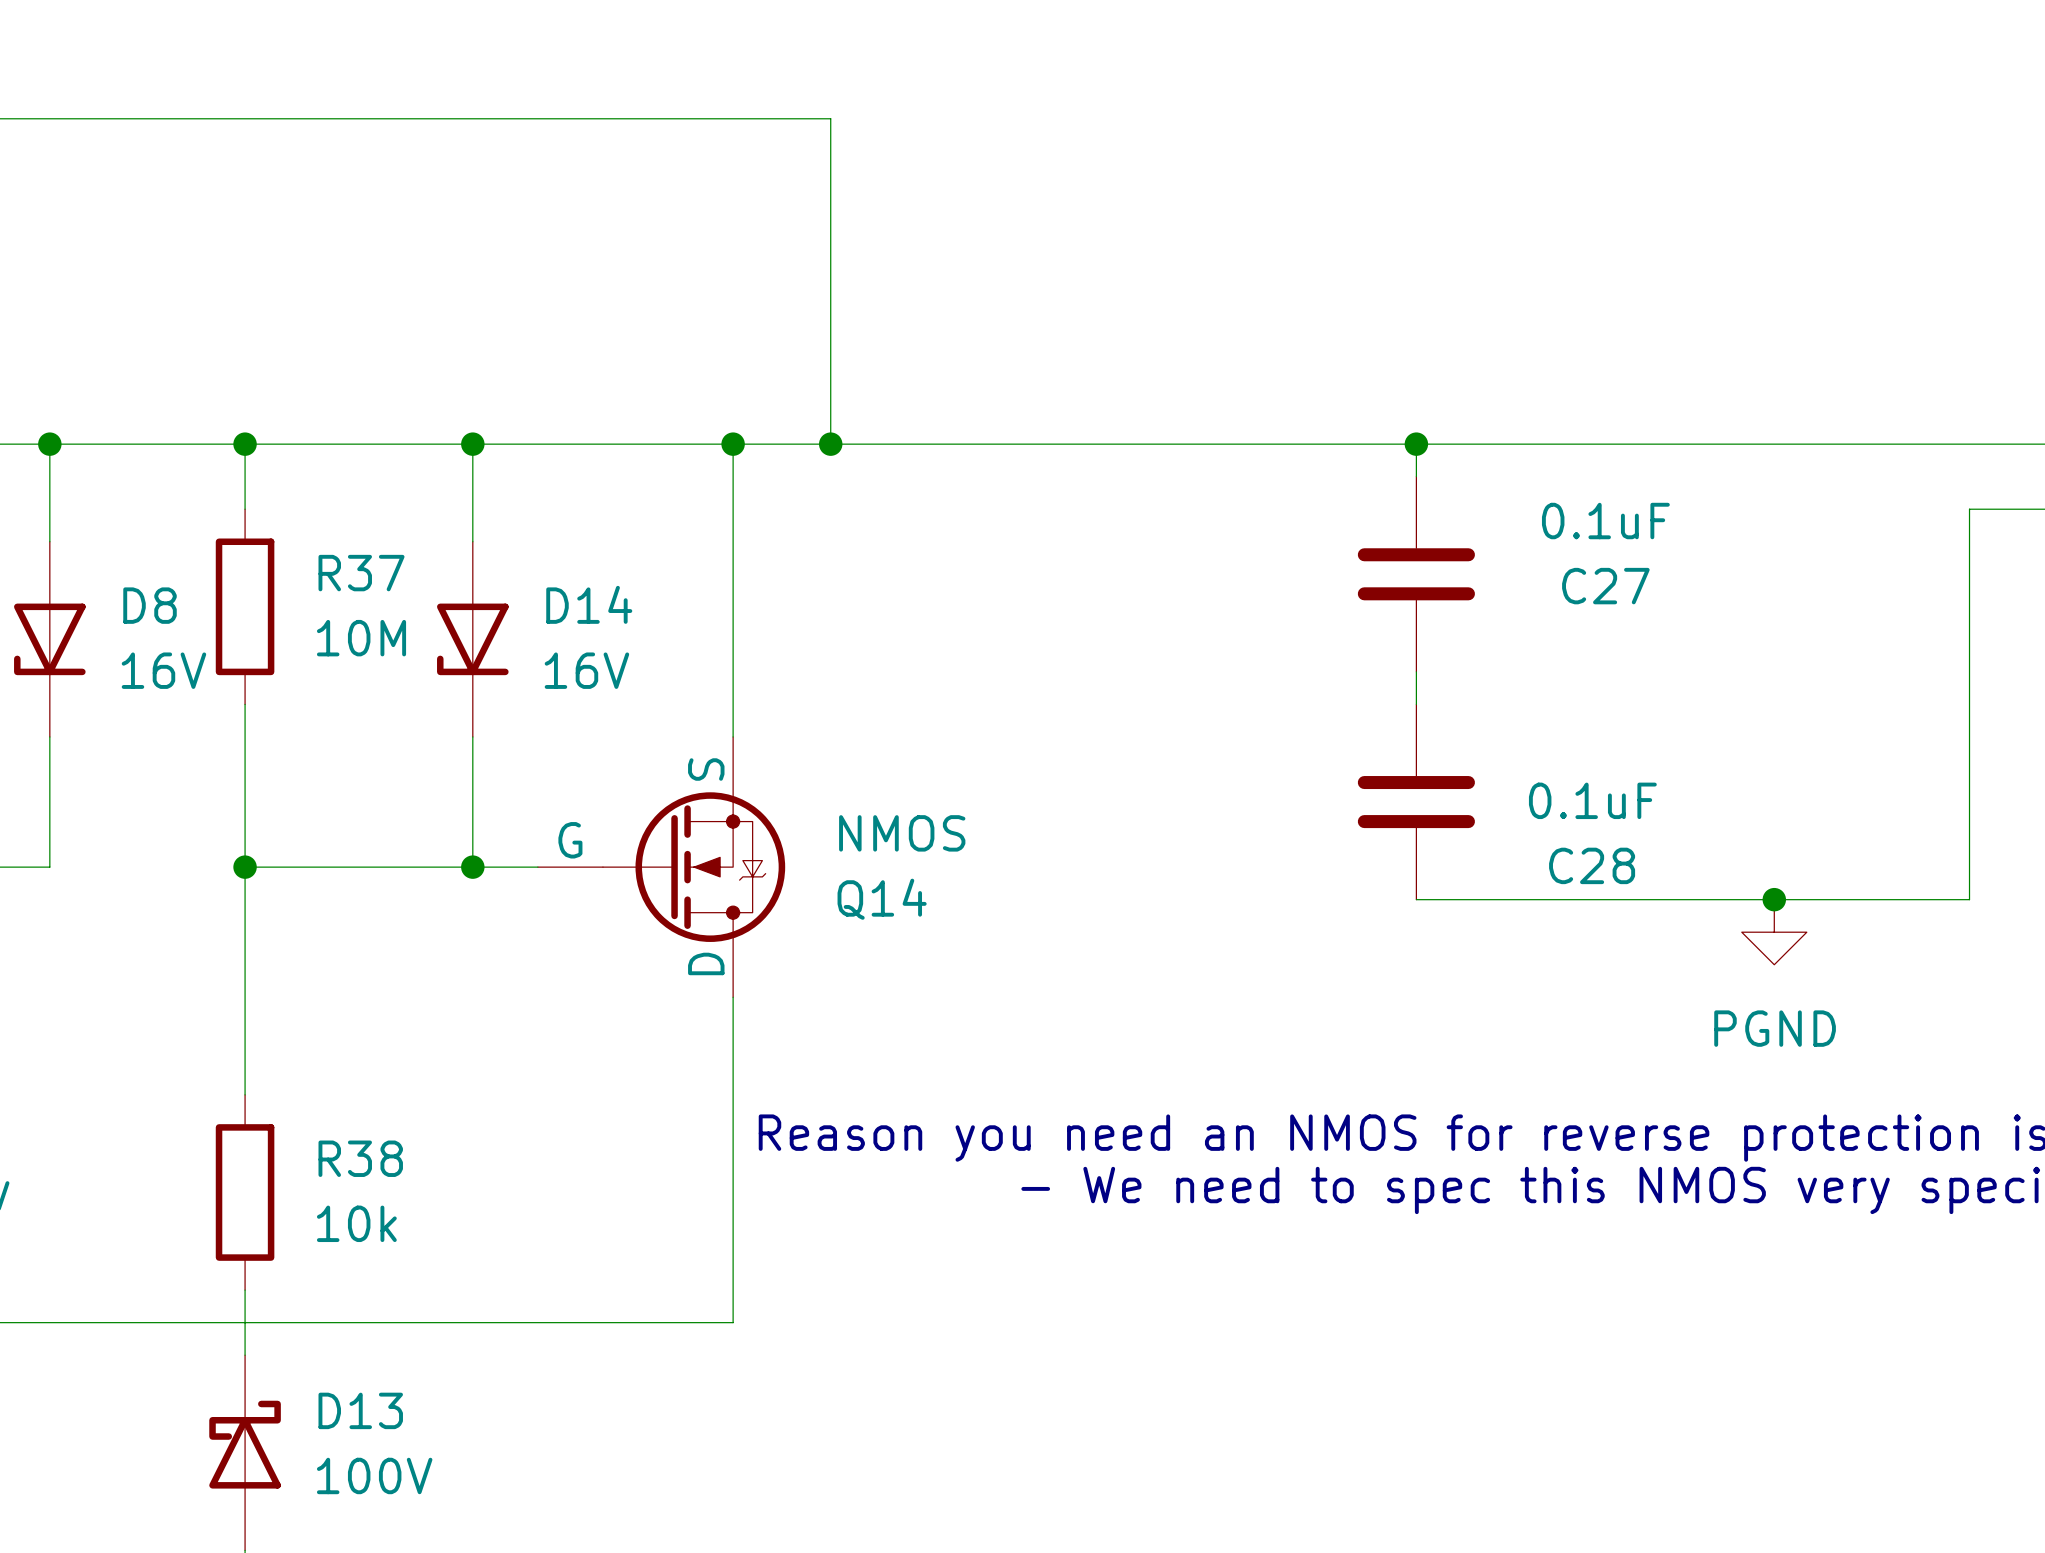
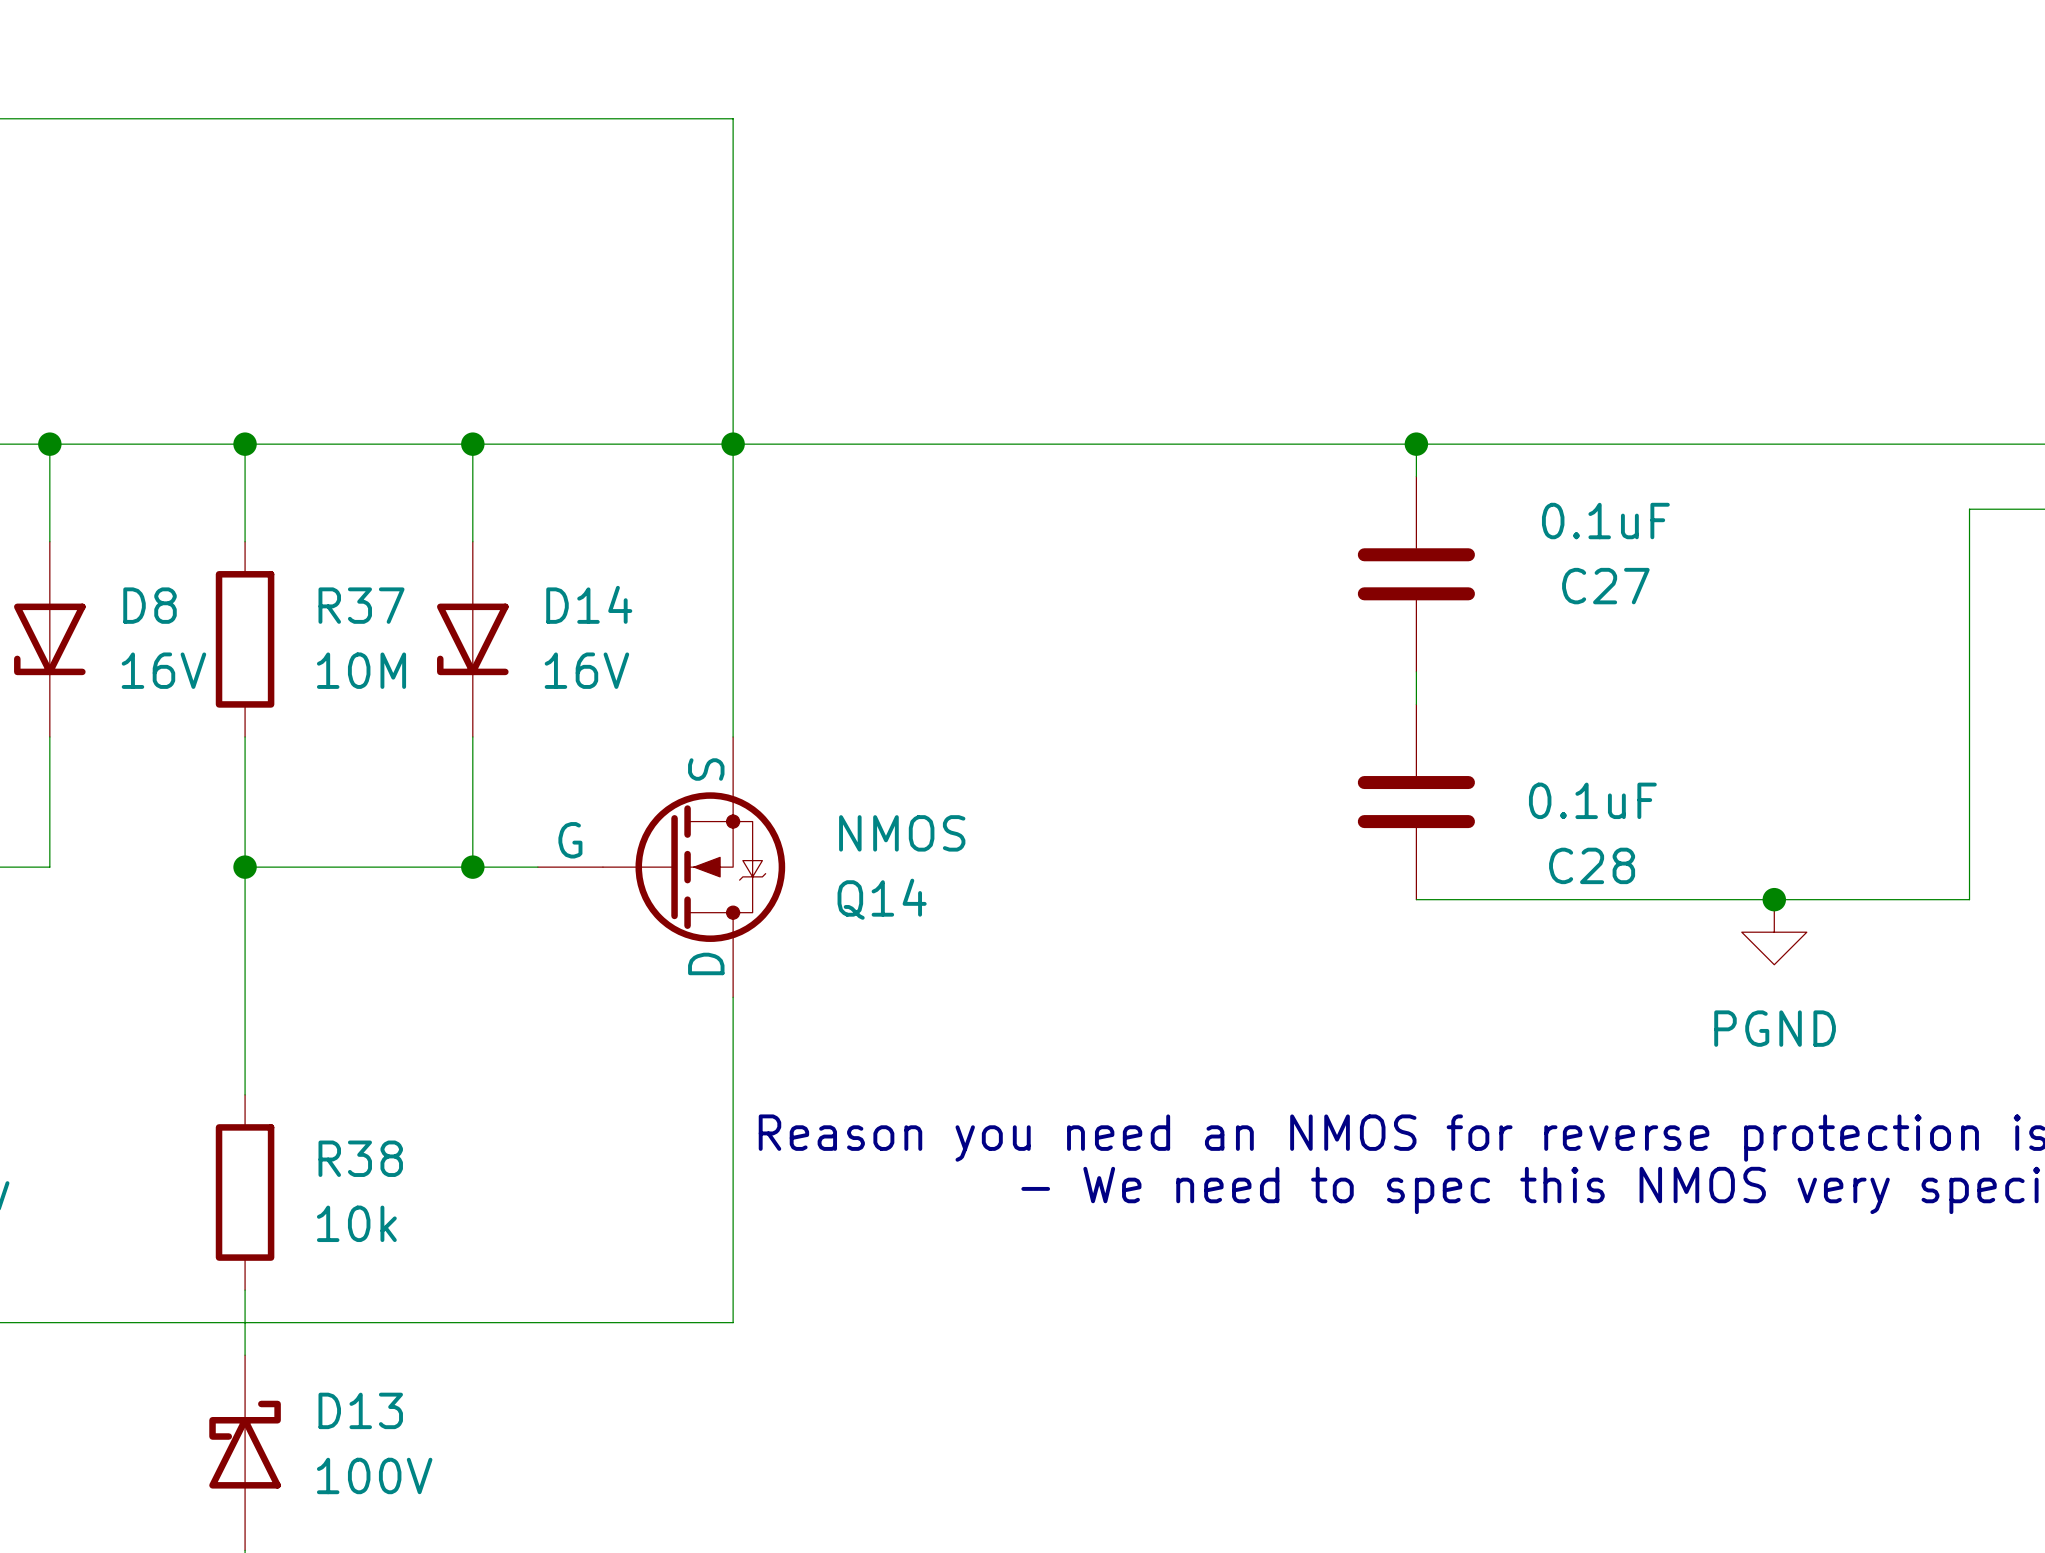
wire: (733, 118) (830, 118) (830, 444) -> (733, 118) (733, 444)
junction: (830, 444) -> none
R37 position: (245, 606) -> (245, 639)

